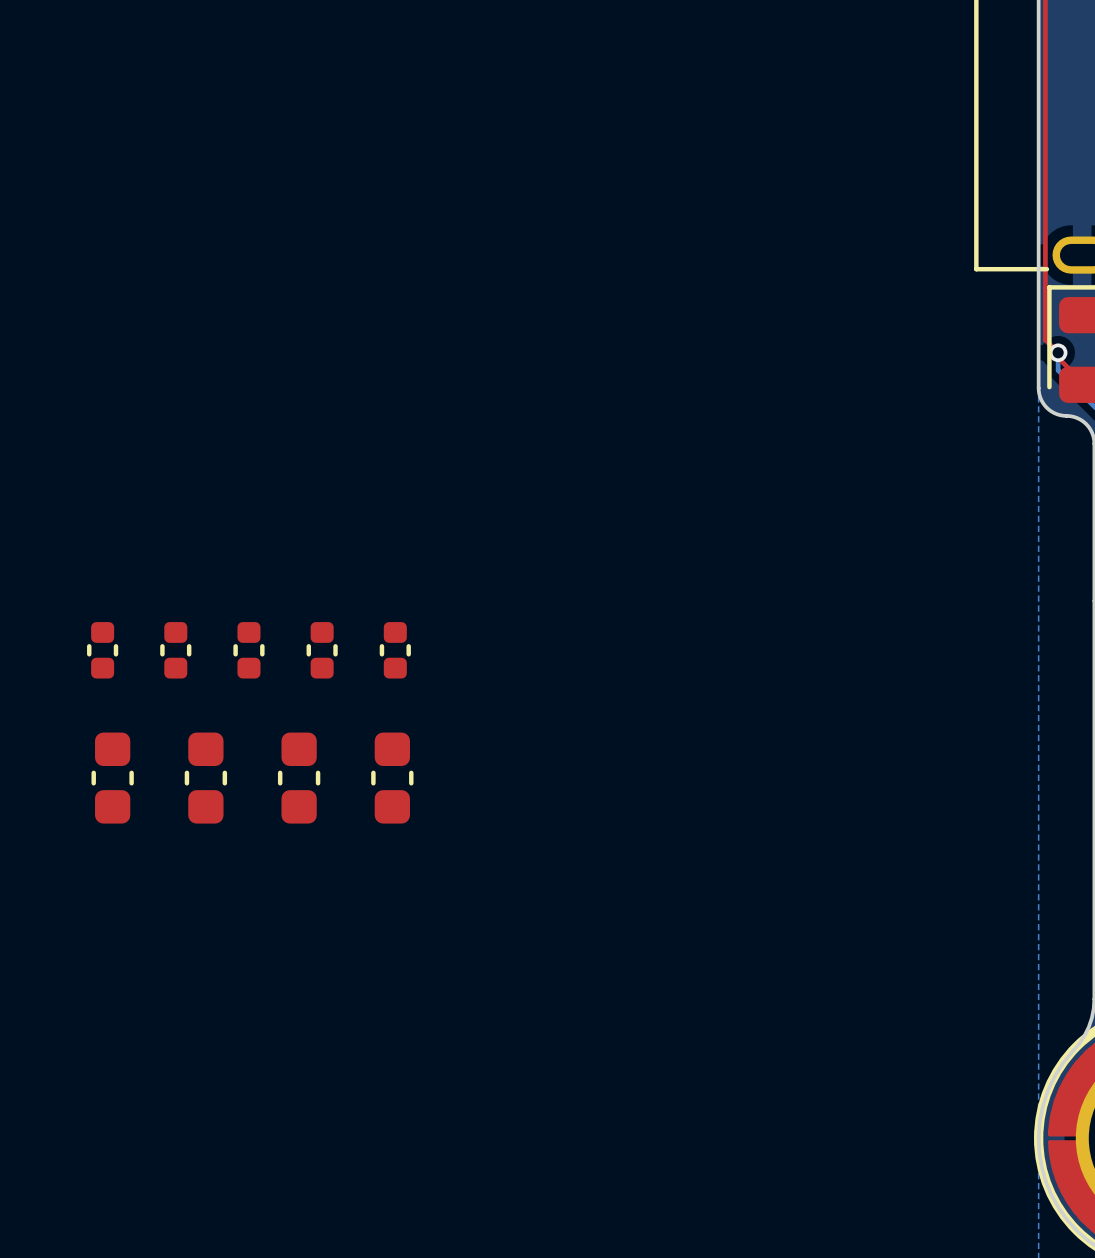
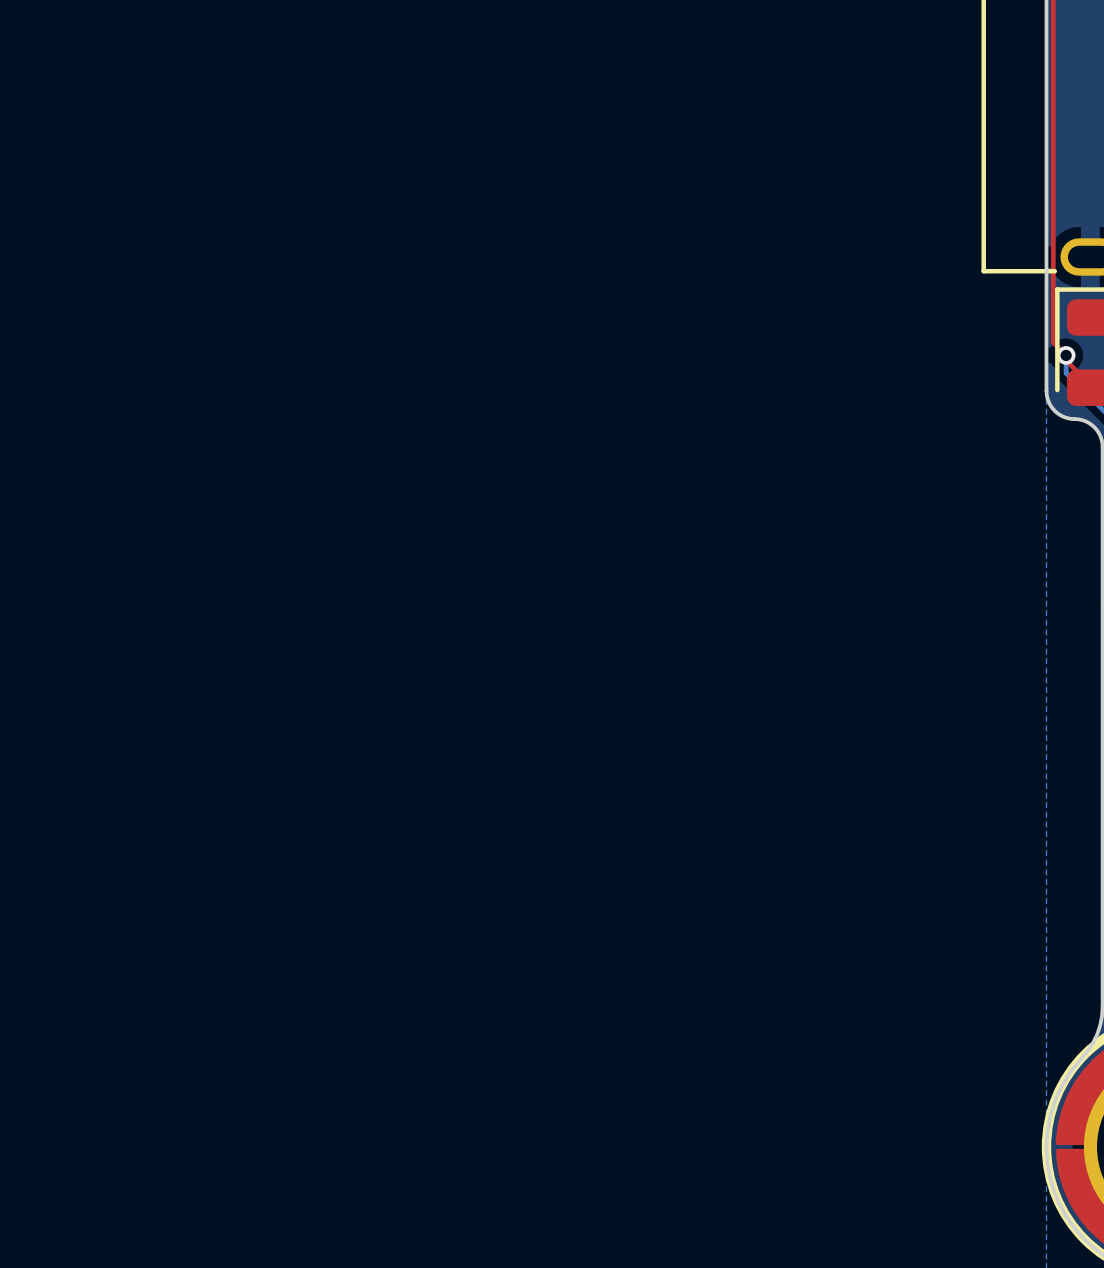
part: (102, 650) -> none
part: (175, 650) -> none
part: (248, 650) -> none
part: (322, 650) -> none
part: (395, 650) -> none
part: (112, 778) -> none
part: (205, 778) -> none
part: (299, 778) -> none
part: (392, 778) -> none

